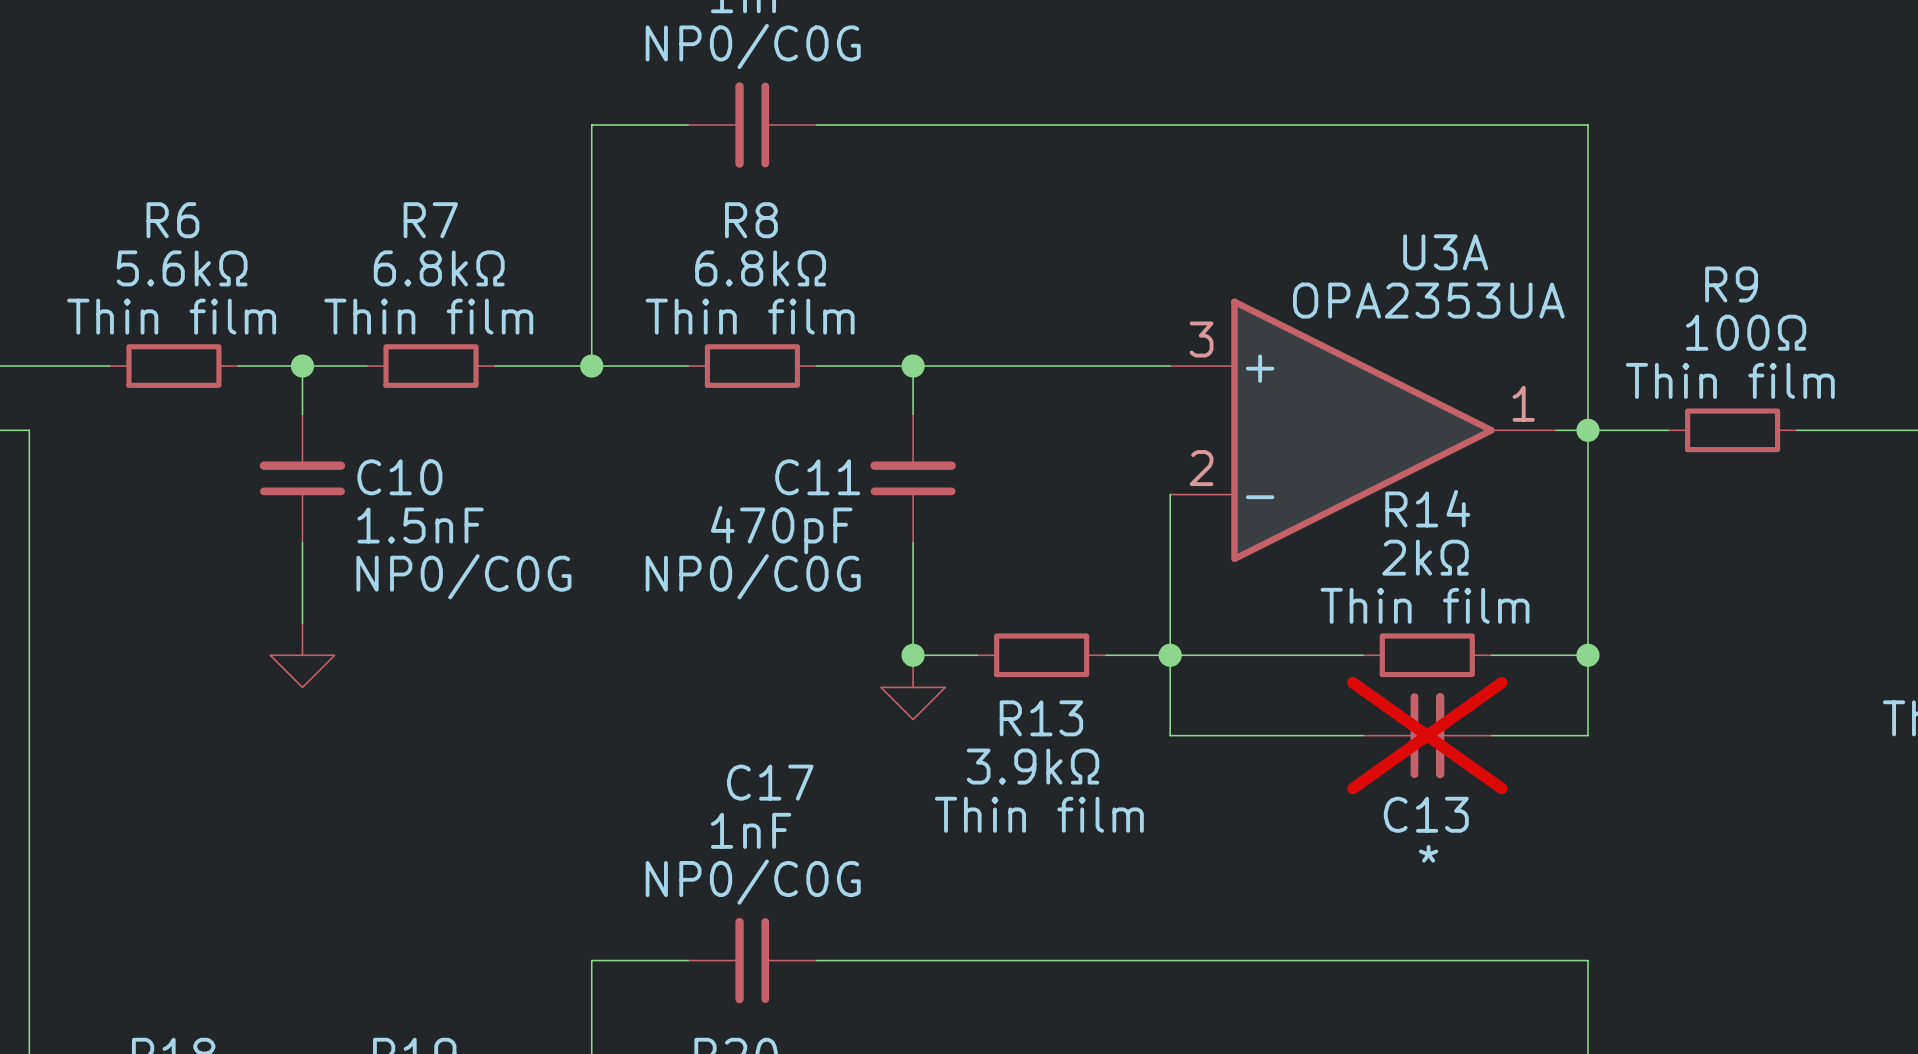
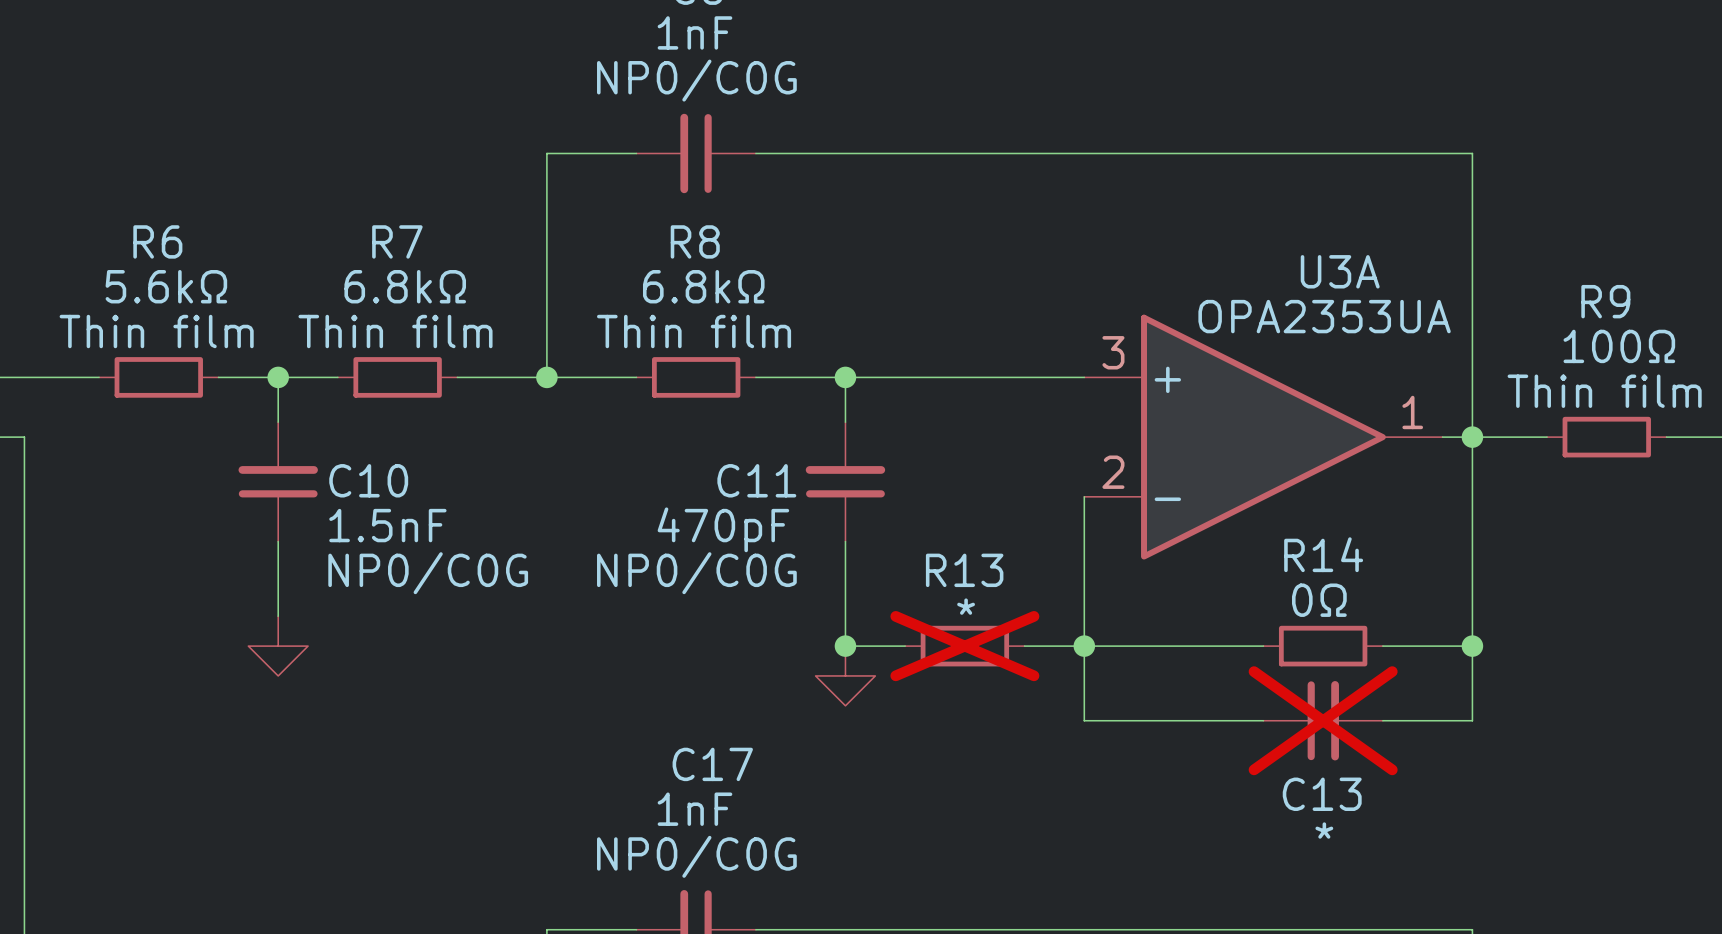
R14 name position: R14 (1427, 508) -> R14 (1323, 554)
R14 value: 2kΩ (1425, 557) -> 0Ω (1319, 600)
R14 text: Thin film (1425, 605) -> none
R13 do-not-place cross: none -> (964, 646)
R13 name position: R13 (1041, 718) -> R13 (964, 570)
R13 value: 3.9kΩ (1032, 766) -> * (966, 606)
R13 text: Thin film (1039, 814) -> none

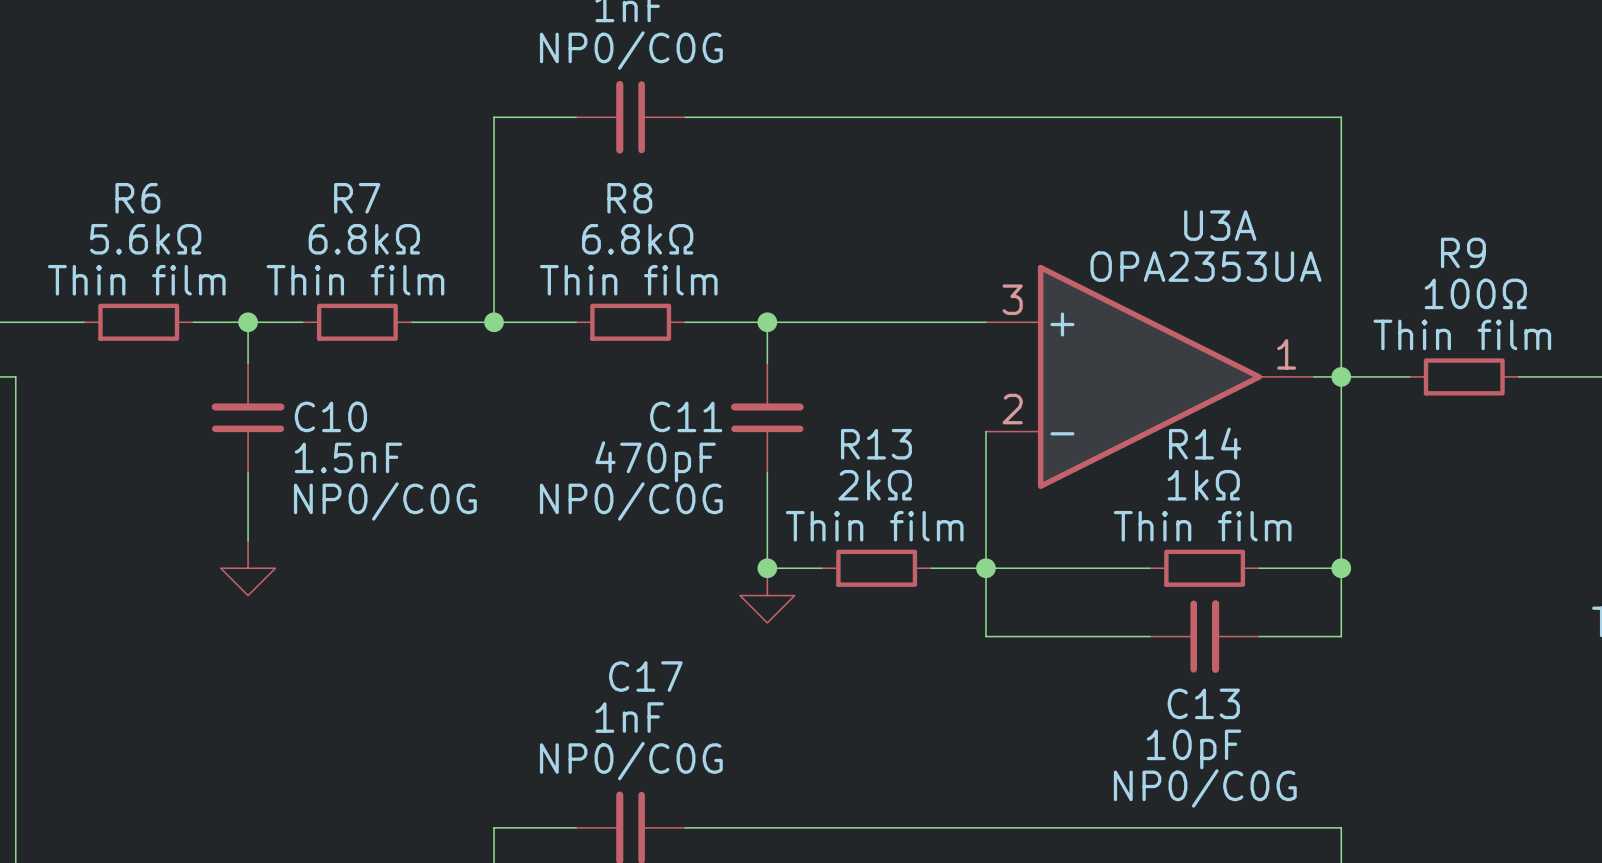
R14 name position: R14 (1323, 554) -> R14 (1205, 443)
R13 name position: R13 (964, 570) -> R13 (876, 444)
R13 text: none -> Thin film (874, 526)
R14 value: 0Ω (1319, 600) -> 1kΩ (1203, 485)
R14 text: none -> Thin film (1202, 526)
R13 value: * (966, 606) -> 2kΩ (875, 485)
R13 do-not-place cross: (964, 646) -> none
C13 do-not-place cross: (1323, 720) -> none
C13 value: * (1324, 830) -> 10pF (1194, 749)
C13 text: none -> NP0/C0G (1205, 788)

